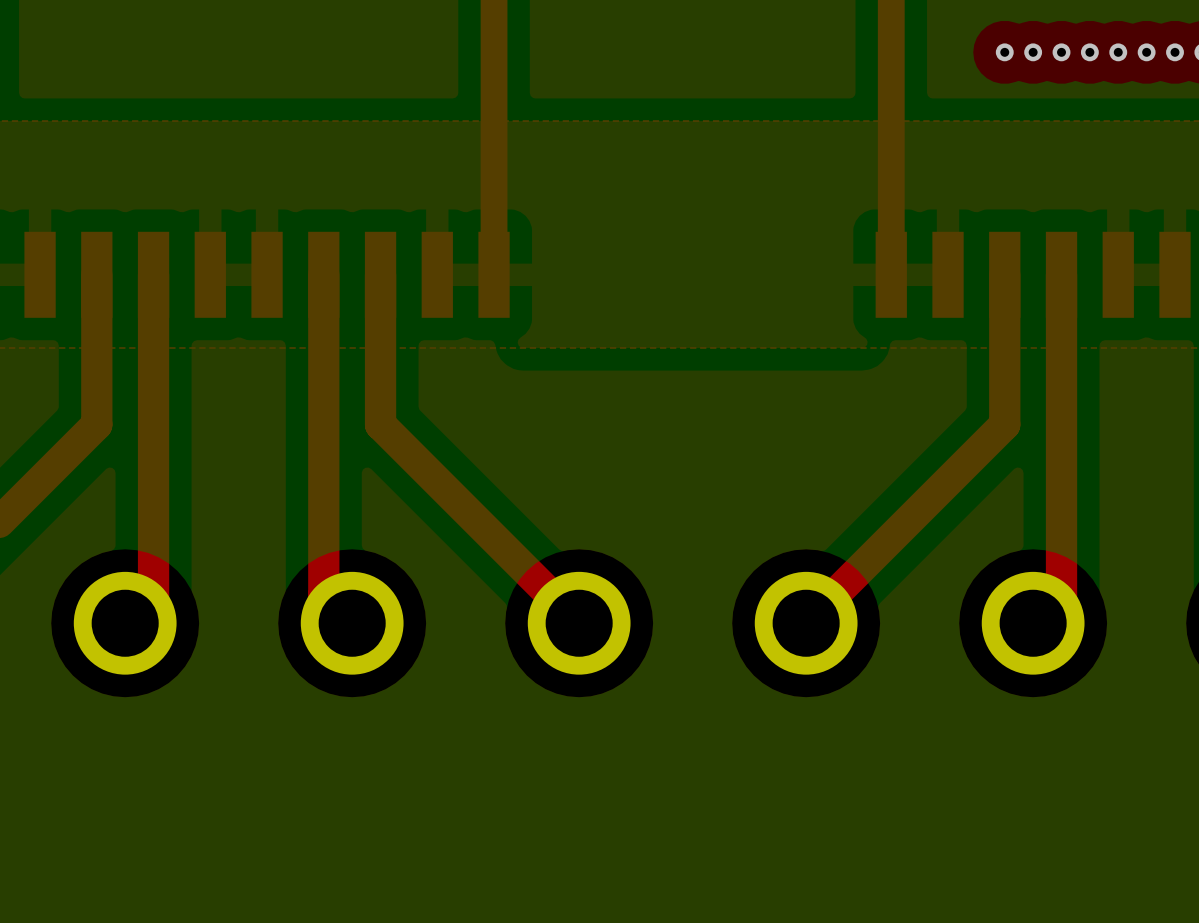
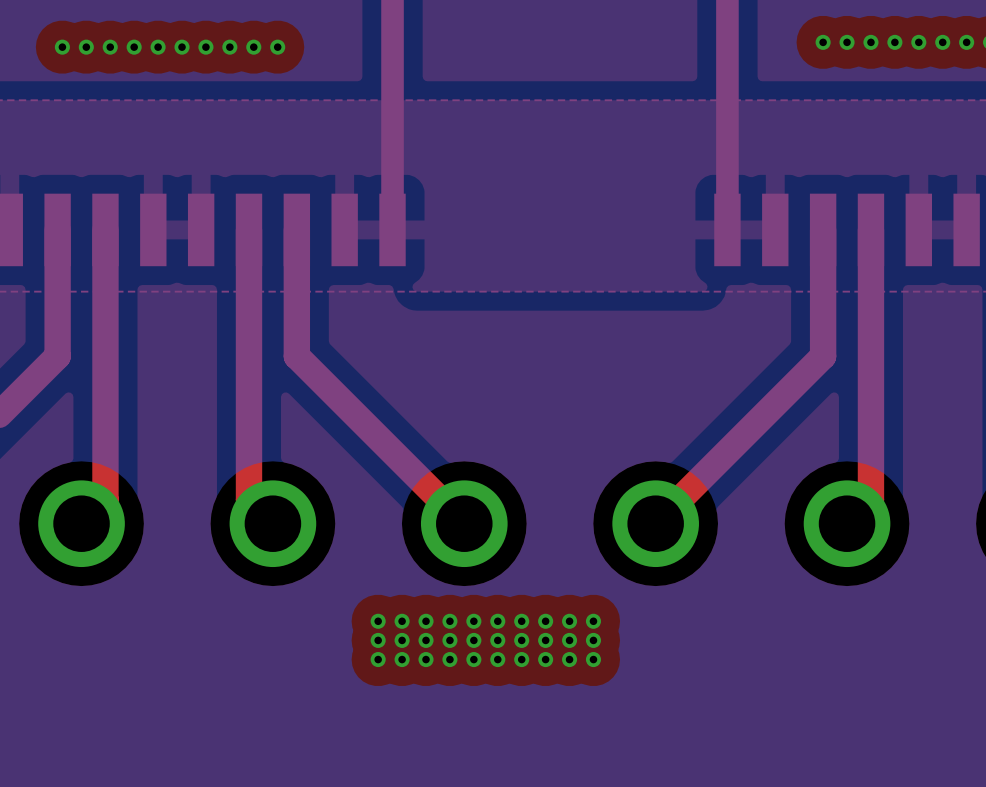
via: none -> (62, 47)
via: none -> (86, 47)
via: none -> (110, 47)
via: none -> (134, 47)
via: none -> (158, 47)
via: none -> (182, 47)
via: none -> (205, 47)
via: none -> (229, 47)
via: none -> (253, 47)
via: none -> (277, 47)
via: none -> (378, 621)
via: none -> (402, 621)
via: none -> (426, 621)
via: none -> (449, 621)
via: none -> (473, 621)
via: none -> (497, 621)
via: none -> (521, 621)
via: none -> (545, 621)
via: none -> (569, 621)
via: none -> (593, 621)
via: none -> (378, 640)
via: none -> (402, 640)
via: none -> (426, 640)
via: none -> (449, 640)
via: none -> (473, 640)
via: none -> (497, 640)
via: none -> (521, 640)
via: none -> (545, 640)
via: none -> (569, 640)
via: none -> (593, 640)
via: none -> (378, 659)
via: none -> (402, 659)
via: none -> (426, 659)
via: none -> (449, 659)
via: none -> (473, 659)
via: none -> (497, 659)
via: none -> (521, 659)
via: none -> (545, 659)
via: none -> (569, 659)
via: none -> (593, 659)

